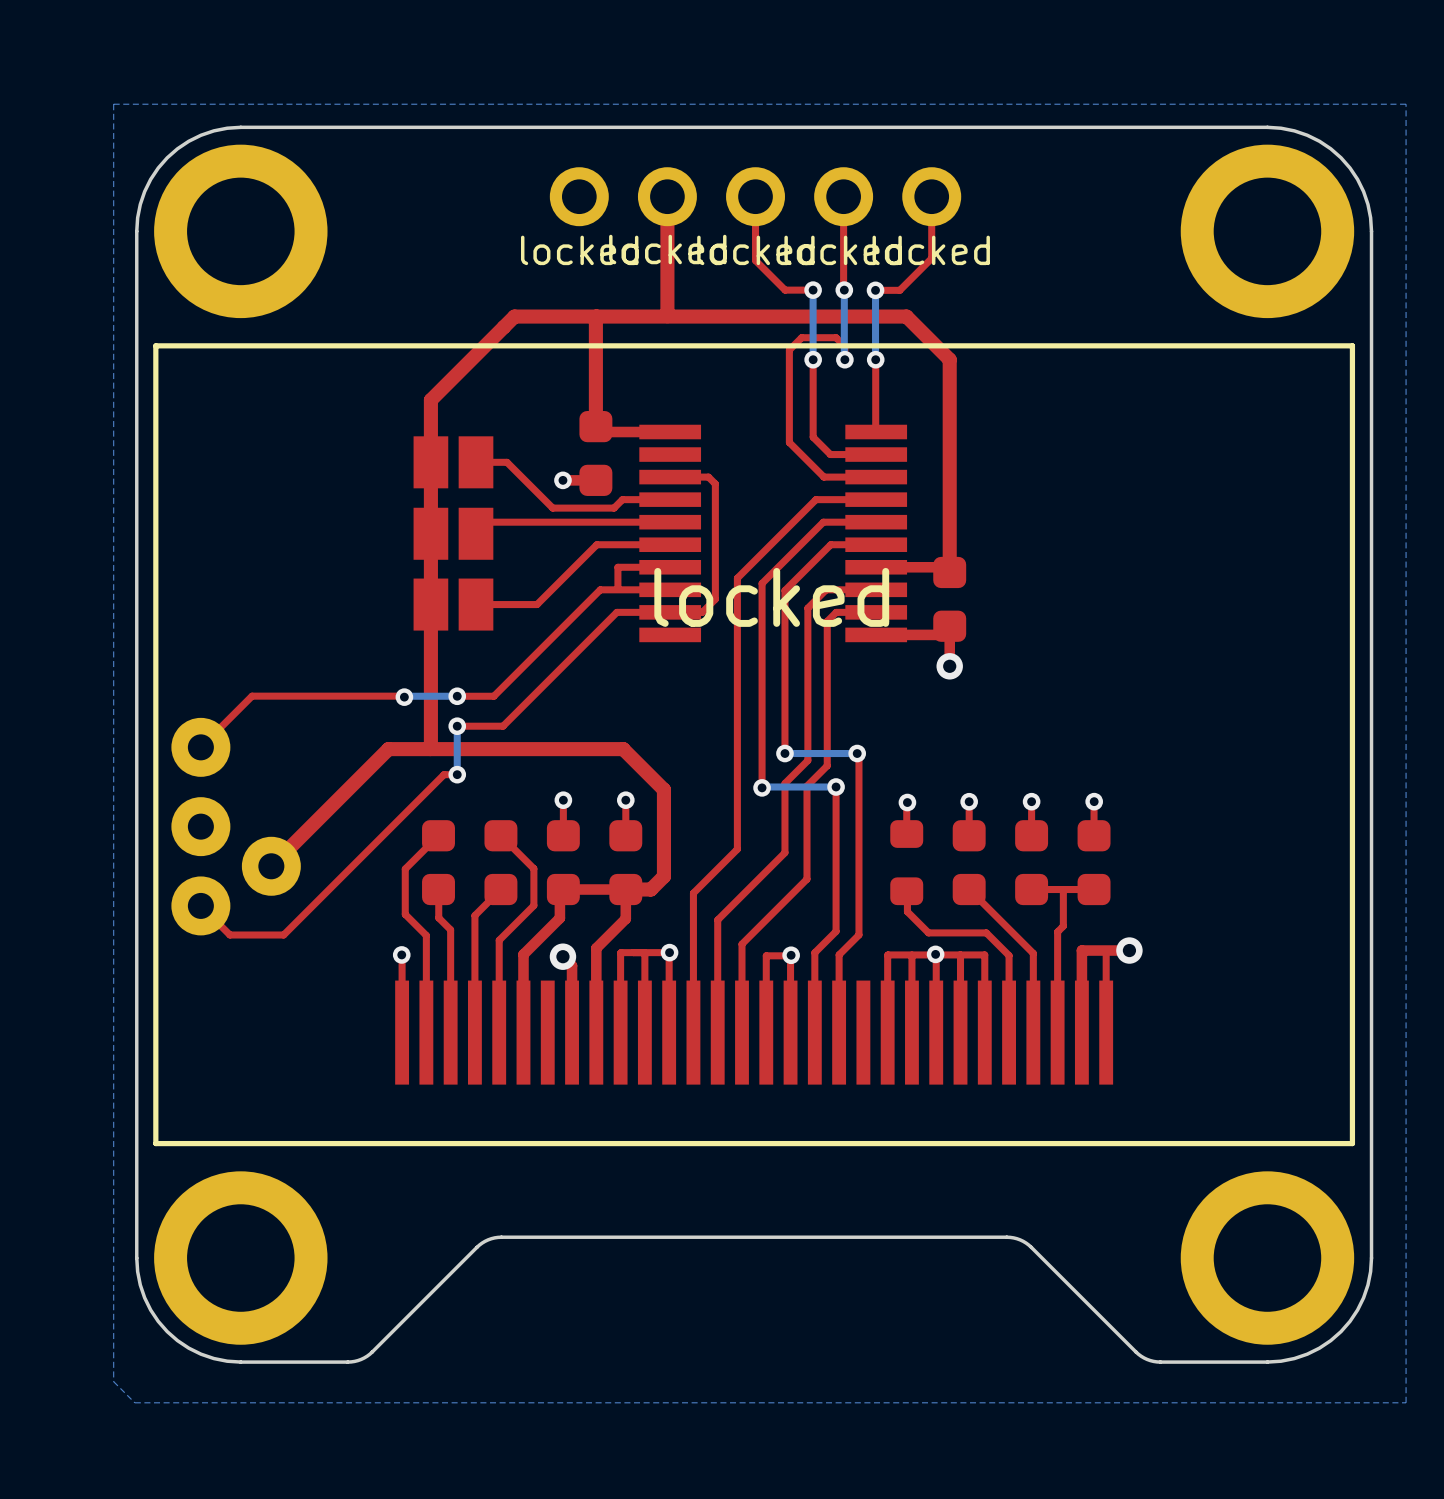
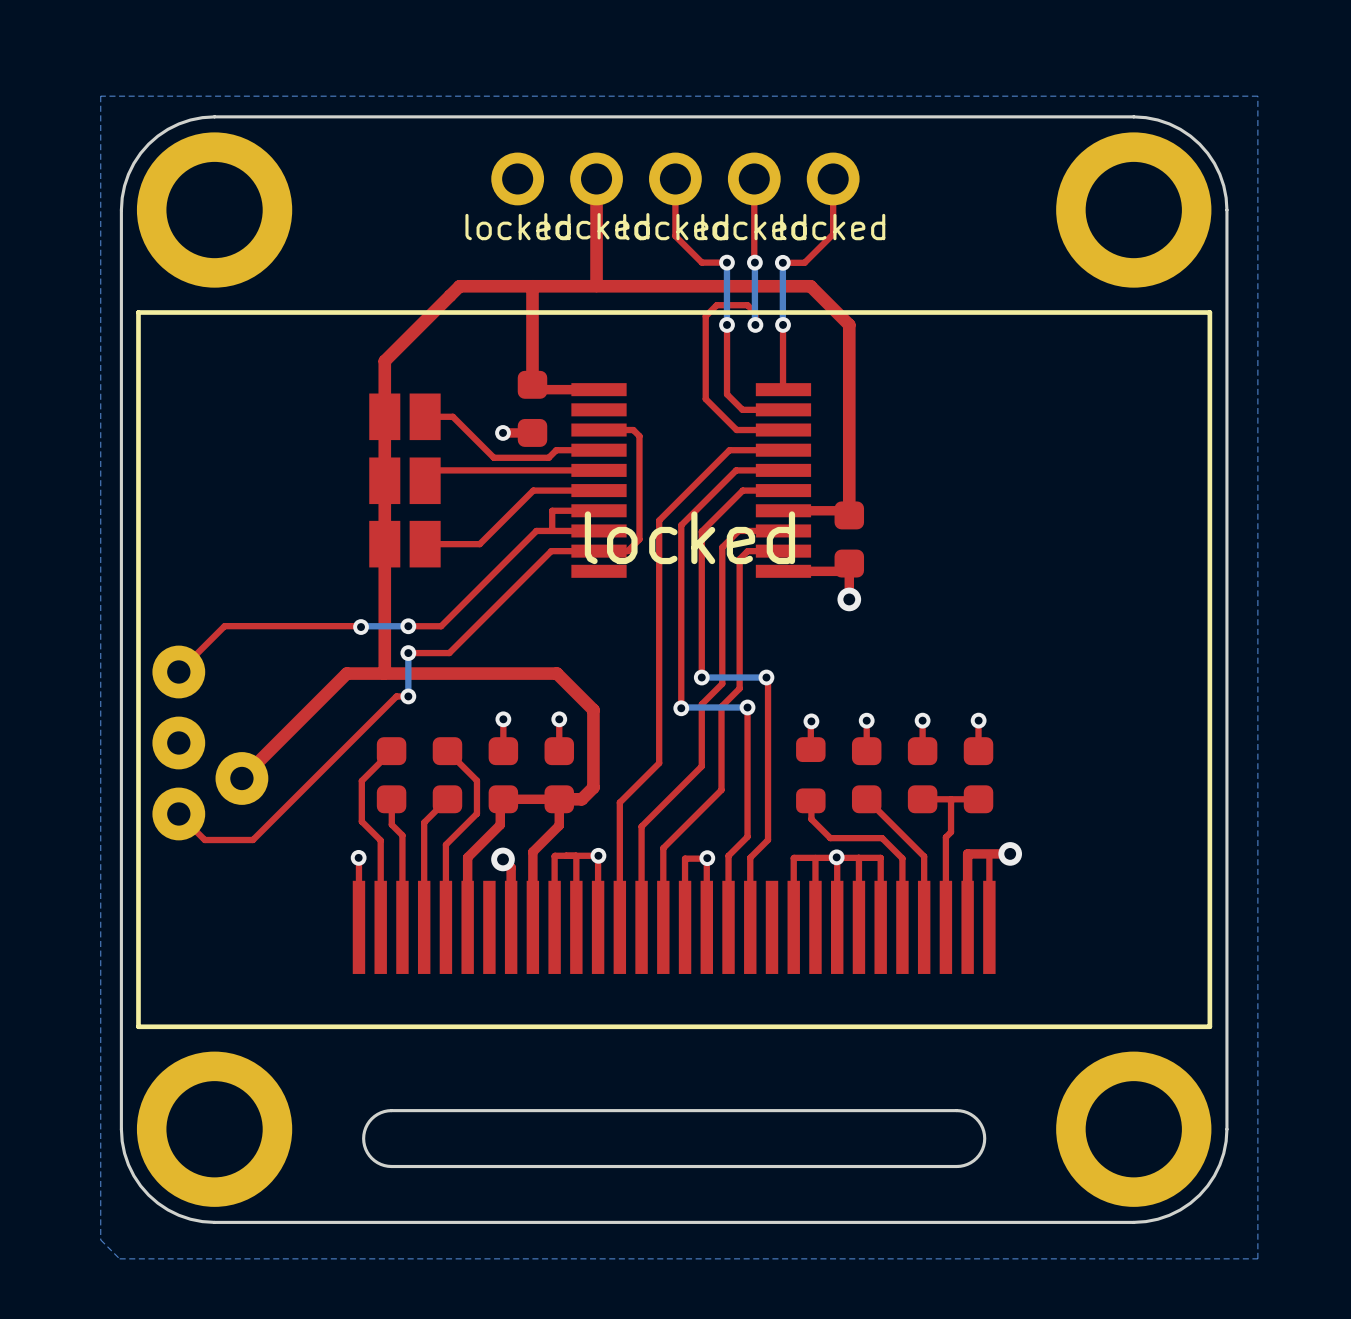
board edge: (501, 1237) (488, 1239) (479, 1245) (369, 1354) (357, 1360) (347, 1362) -> (1037, 1222) (310, 1222)
board edge: (1006, 1237) (1020, 1239) (1028, 1245) (1138, 1354) (1147, 1359) (1160, 1362) -> (900, 1110) (956, 1110) (970, 1114) (978, 1121) (983, 1131) (984, 1142) (980, 1152) (970, 1162) (956, 1166) (391, 1166) (377, 1162) (367, 1152) (363, 1142) (364, 1131) (369, 1121) (377, 1114) (391, 1110) (447, 1110)

